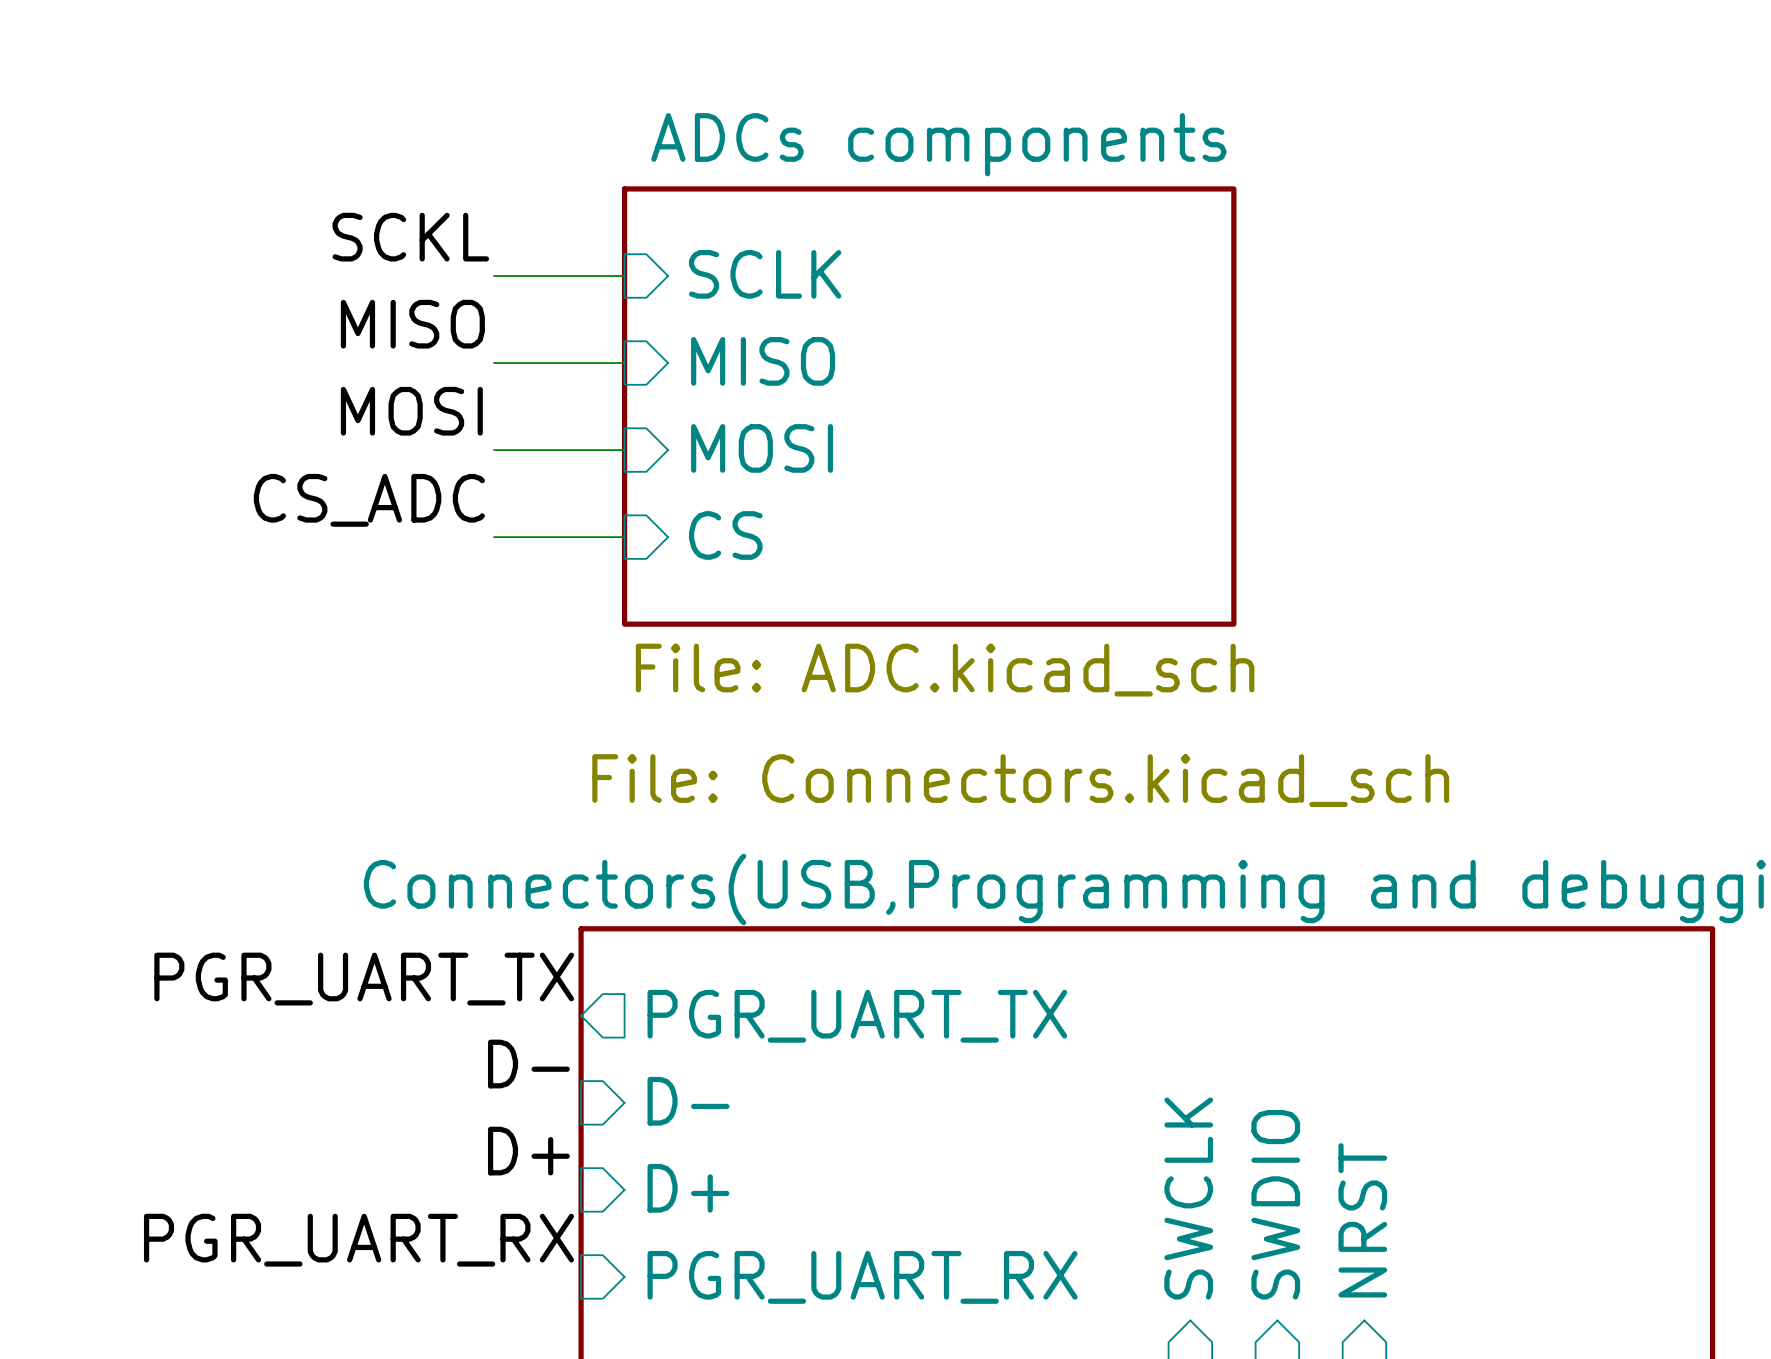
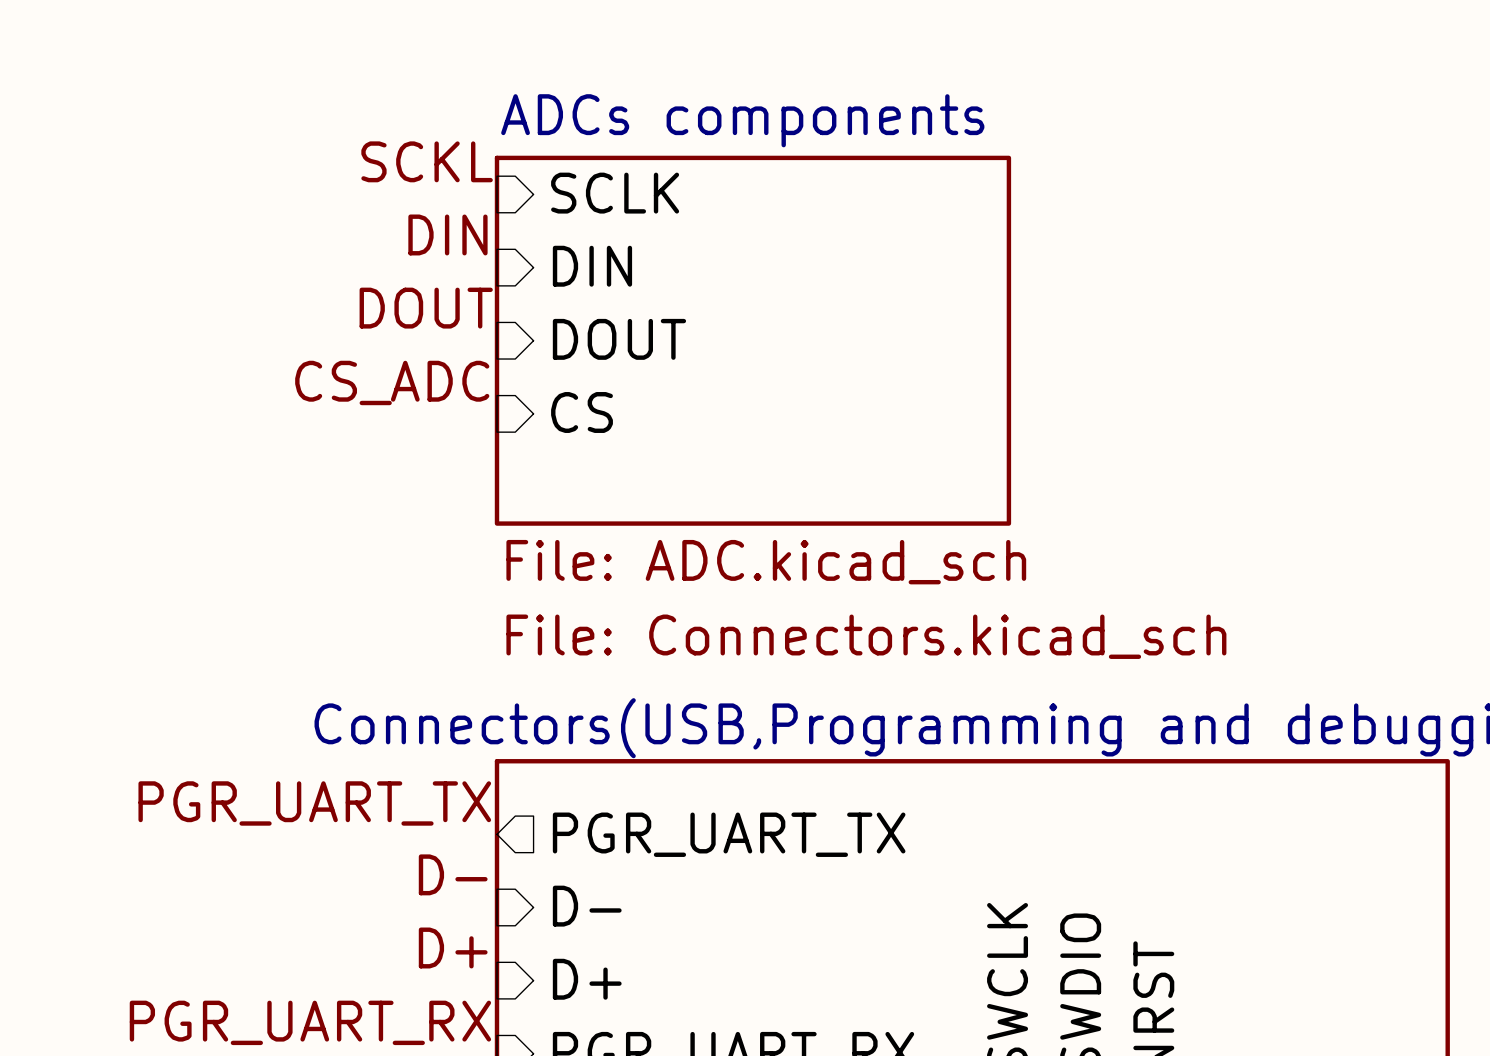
sheet ADCs components name position: ADCs components (938, 144) -> ADCs components (742, 120)
label position: SCKL (410, 237) -> SCKL (427, 161)
sheet pin position: SCLK (765, 274) -> SCLK (615, 193)
wire: (494, 275) (624, 275) -> none
label: none -> DIN (447, 234)
label: MISO (412, 324) -> none
sheet pin: none -> DIN (592, 266)
sheet pin: MISO (763, 361) -> none
wire: (494, 363) (624, 363) -> none
label: none -> DOUT (426, 308)
sheet ADCs components position: (929, 406) -> (752, 340)
label: MOSI (411, 411) -> none
sheet pin: none -> DOUT (619, 339)
sheet pin: MOSI (762, 448) -> none
wire: (494, 450) (624, 450) -> none
label position: CS_ADC (369, 500) -> CS_ADC (392, 382)
sheet pin position: CS (725, 535) -> CS (582, 412)
wire: (494, 537) (624, 537) -> none

